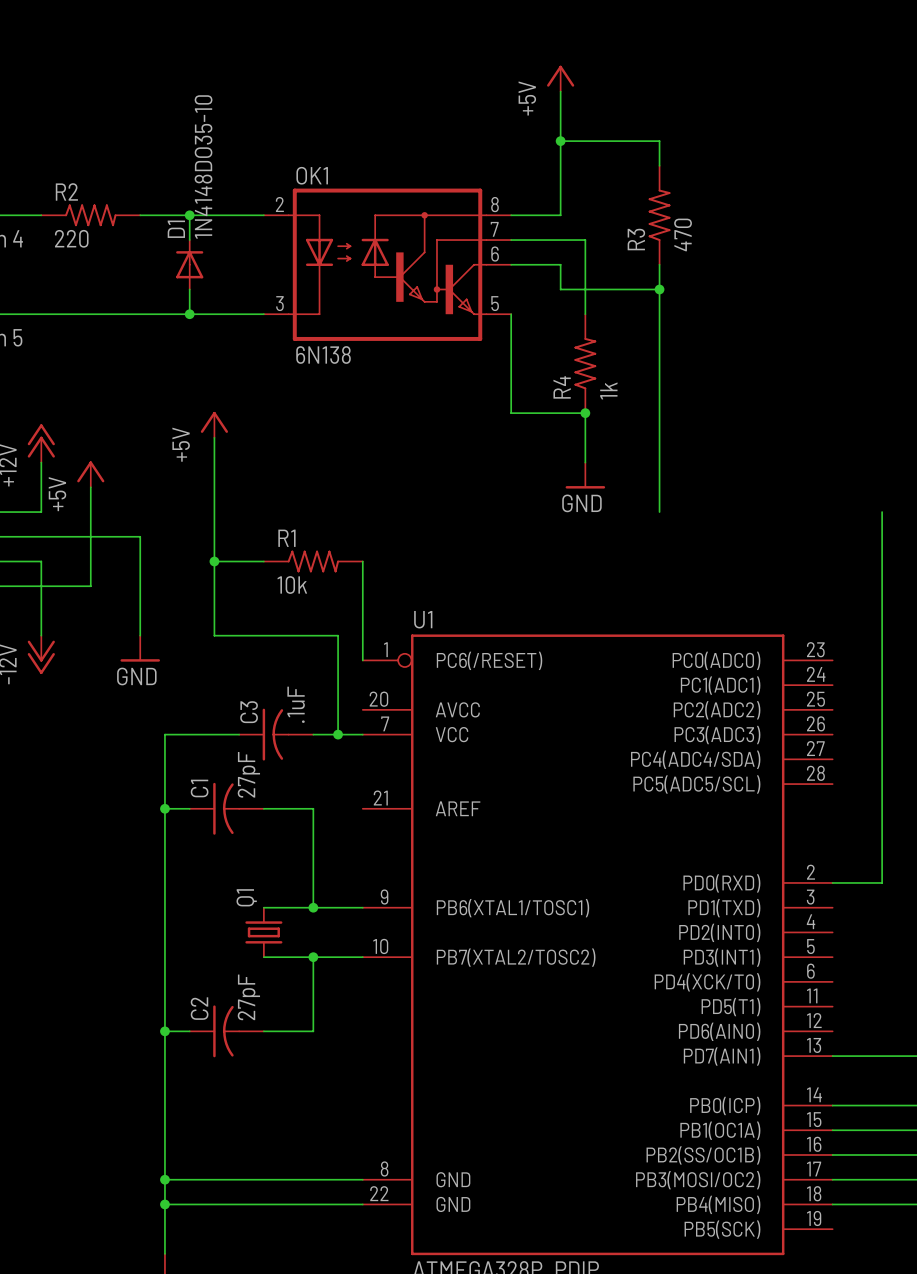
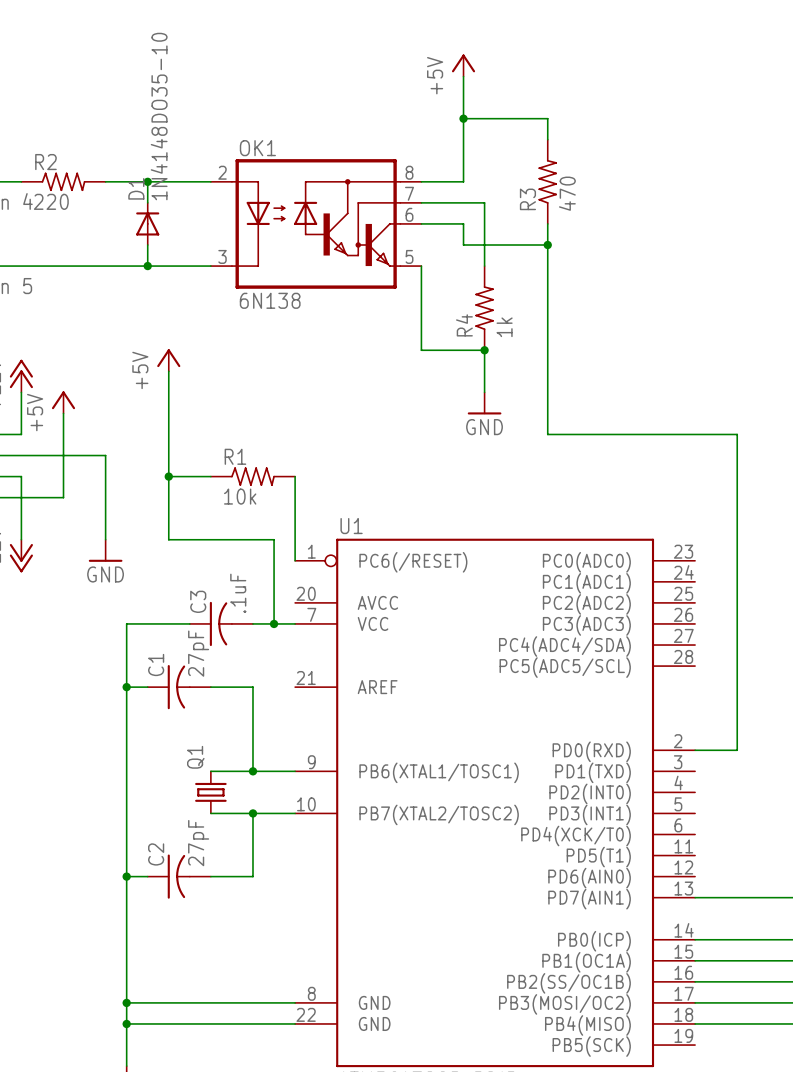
wire: none -> (547, 434) (737, 434)

